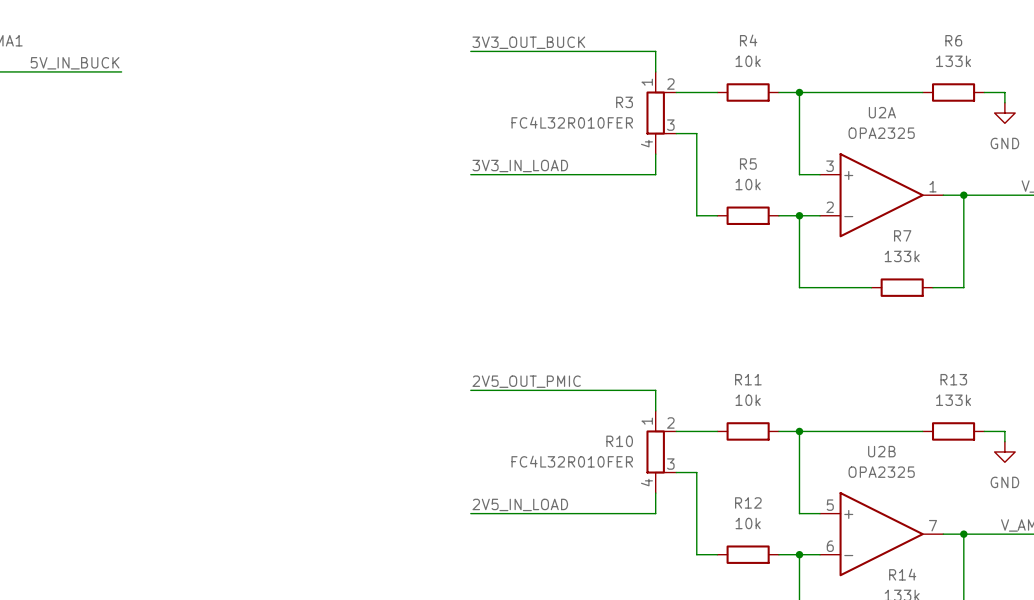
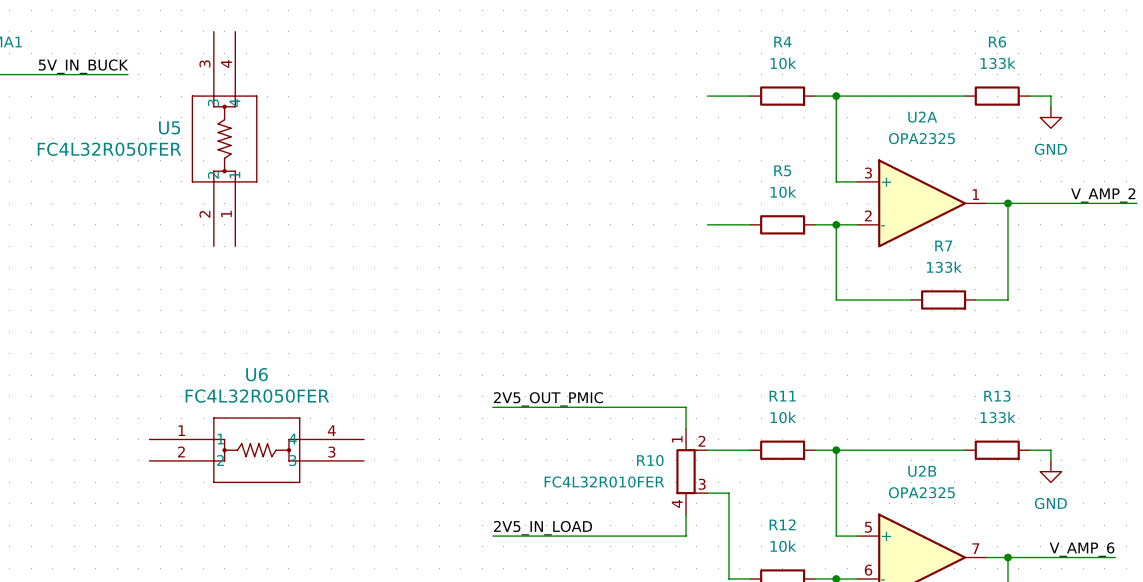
label: 3V3_OUT_BUCK (528, 42) -> none
wire: (470, 51) (655, 51) (655, 71) -> none
R3: FC4L32R010FER (661, 113) -> none
U5: none -> FC4L32R050FER (224, 138)
wire: (676, 133) (696, 133) (696, 215) -> (707, 224) (728, 224)
wire: (655, 154) (655, 174) (470, 174) -> none
label: 3V3_IN_LOAD (520, 165) -> none
U6: none -> FC4L32R050FER (256, 450)

